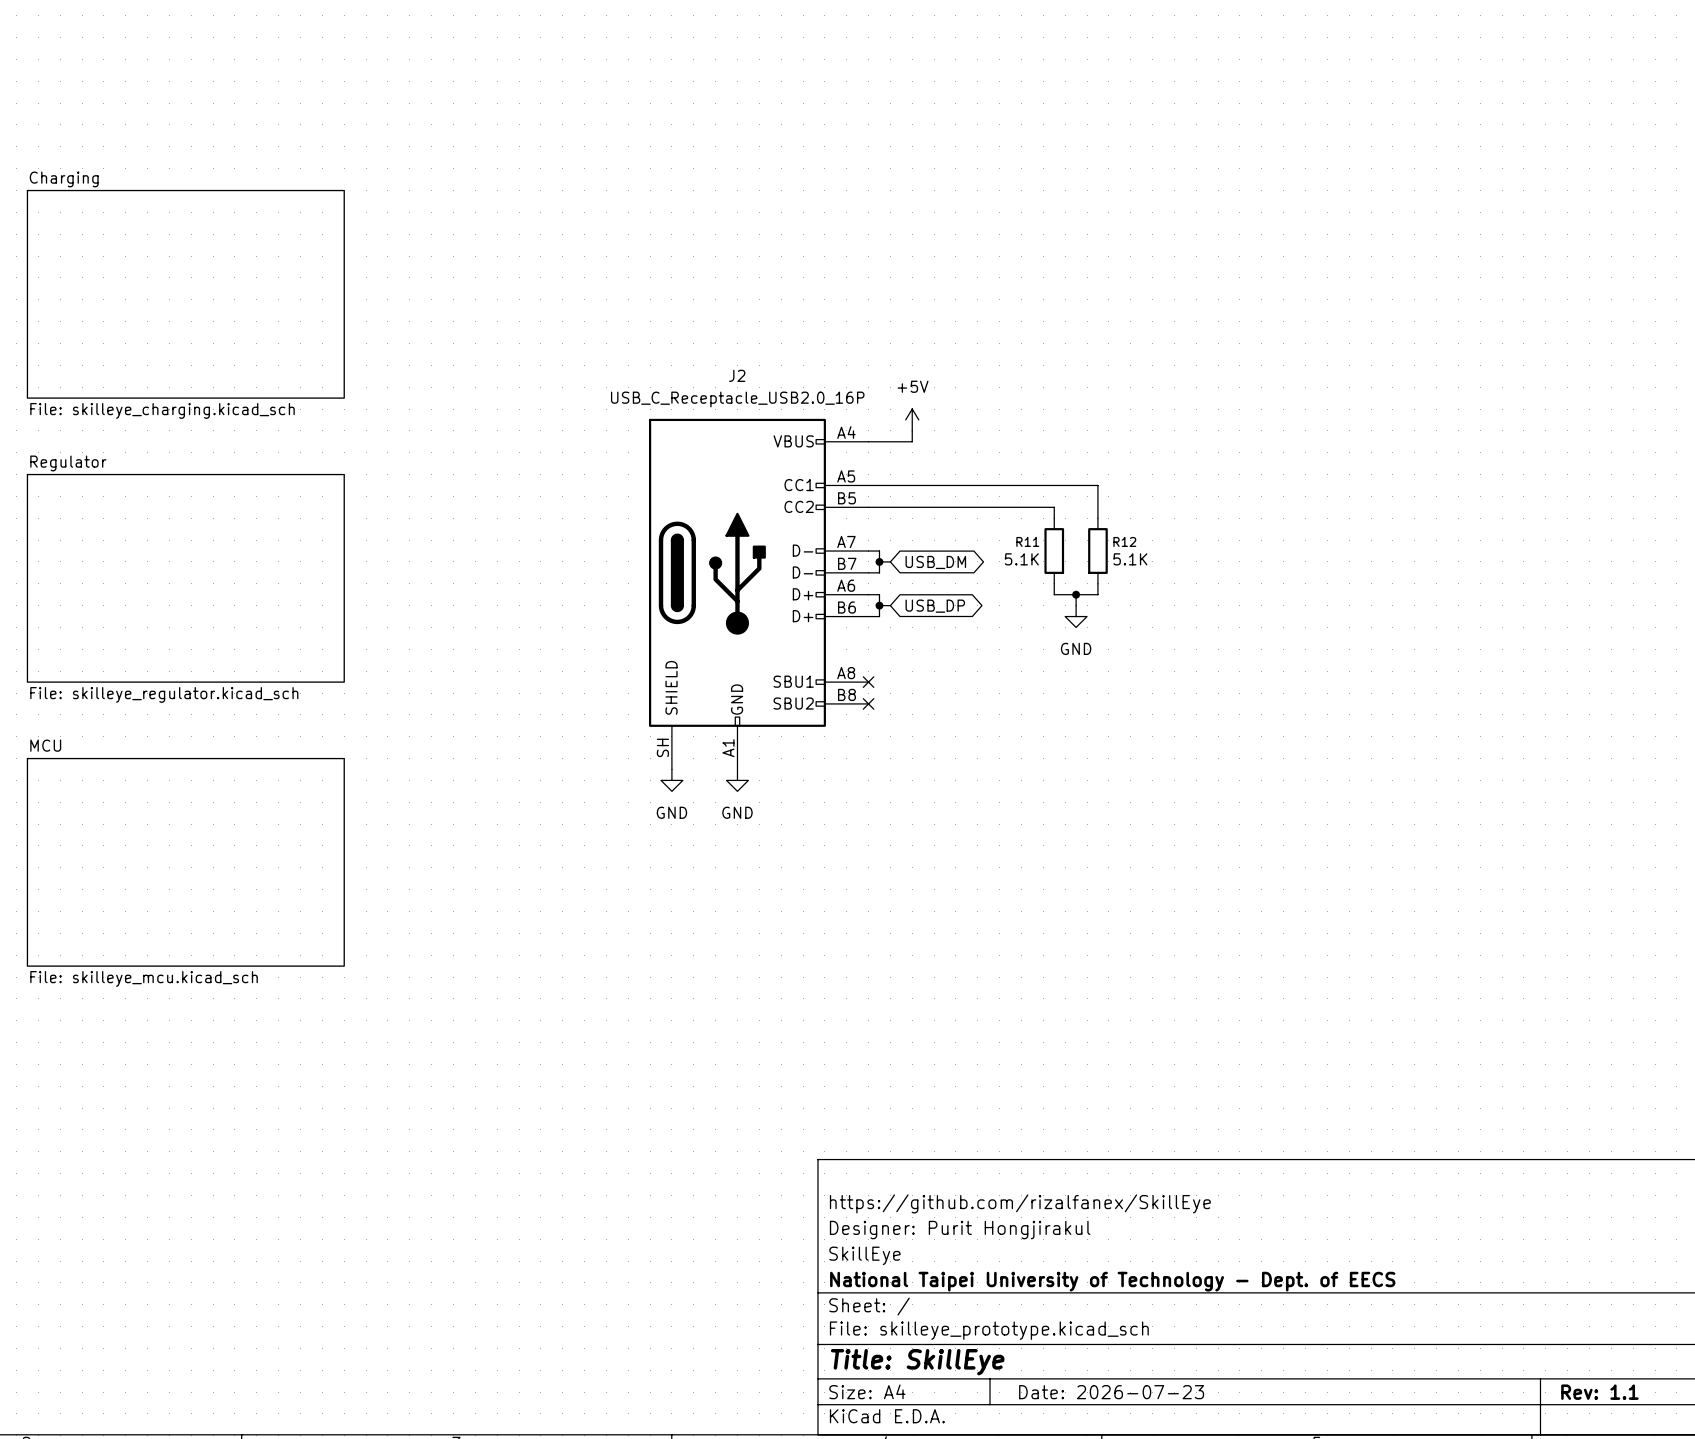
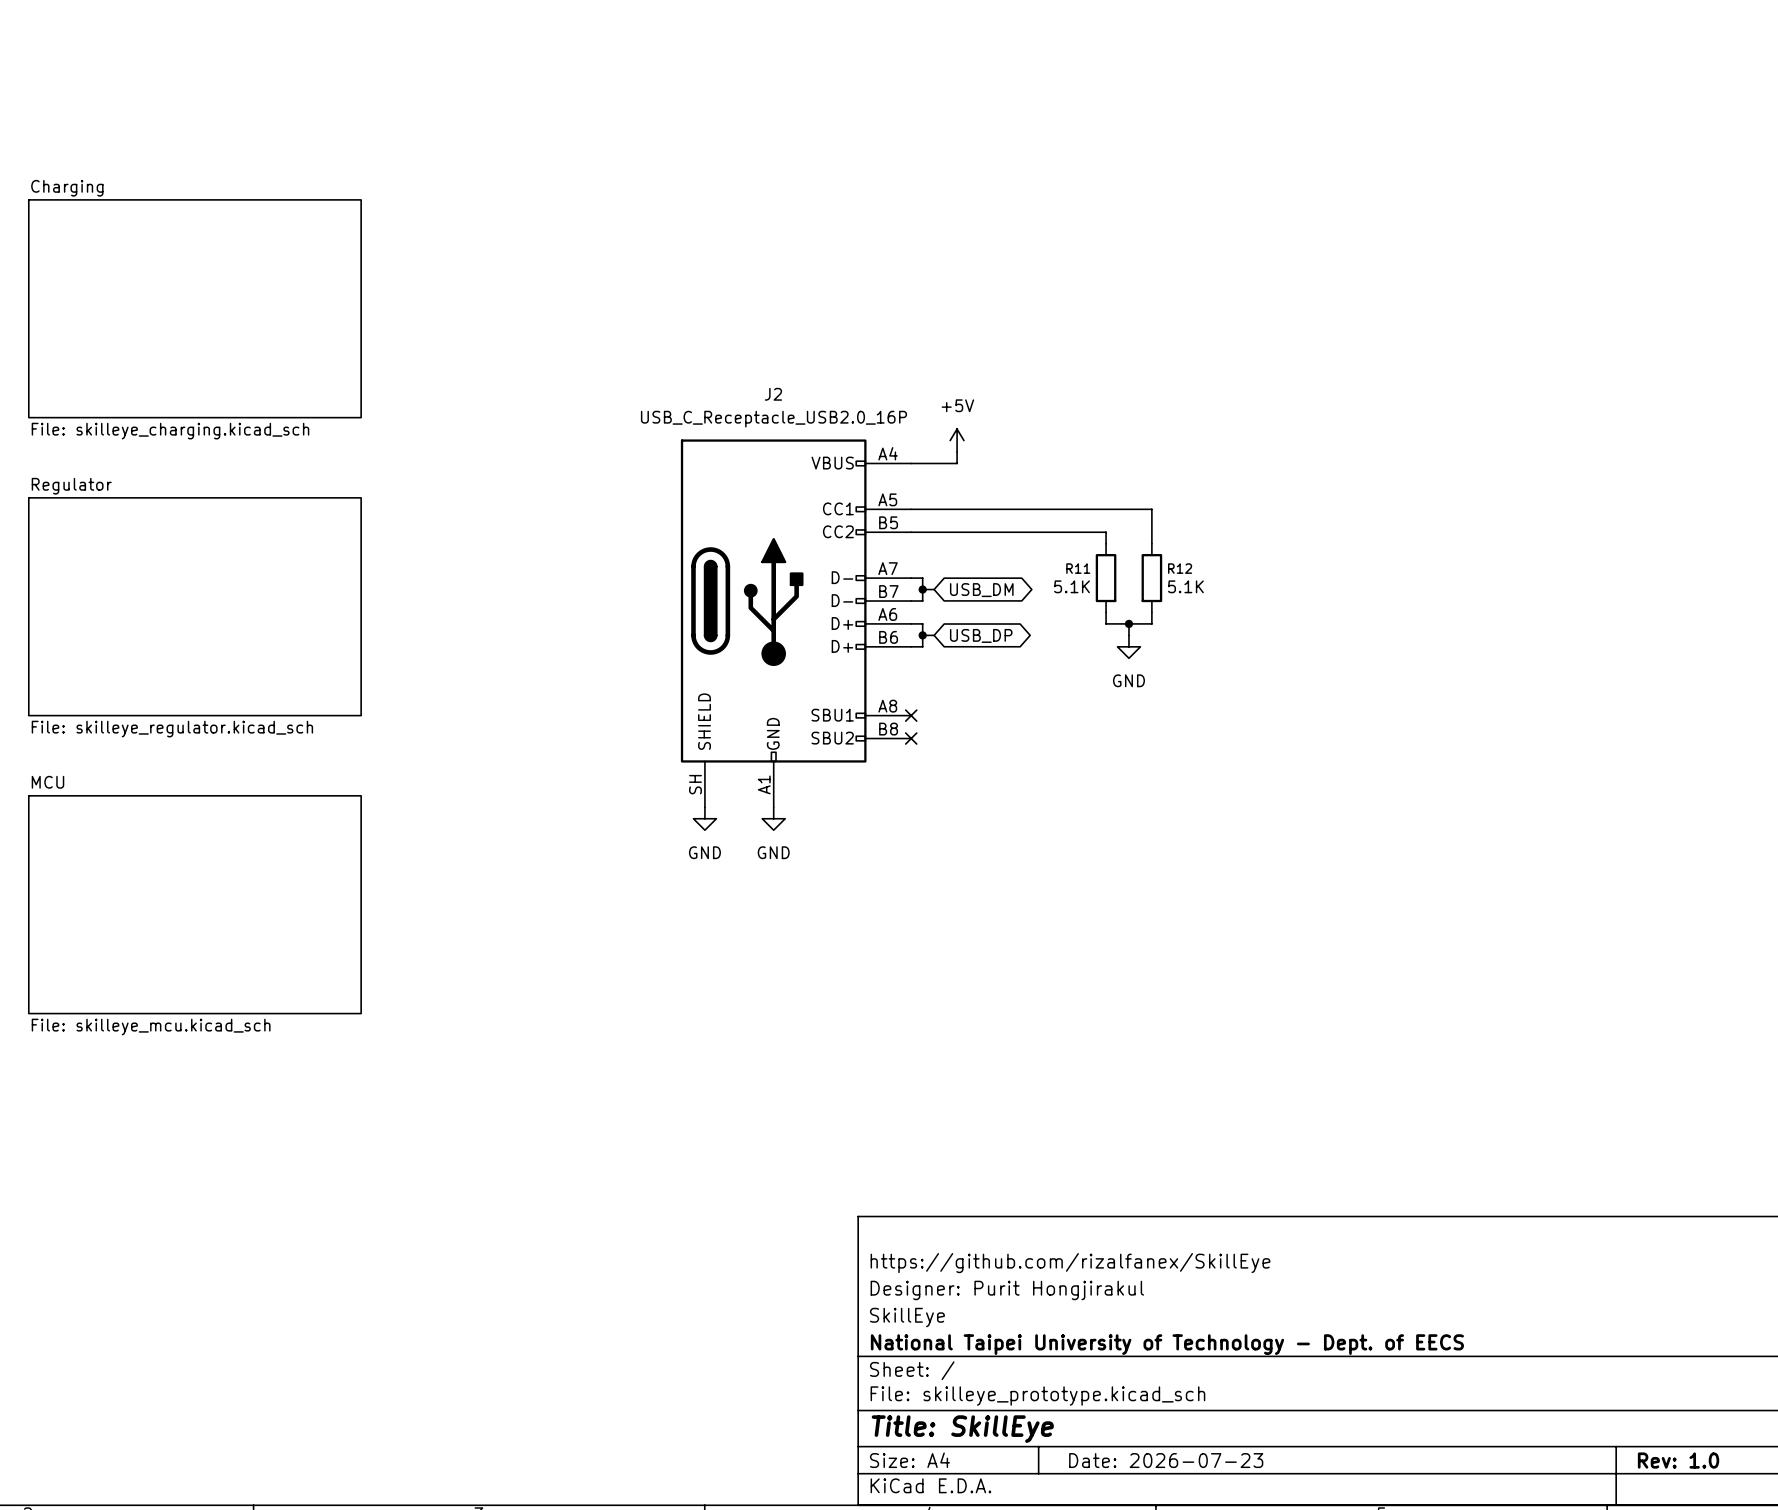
title block: Rev: 1.1 (1599, 1392) -> Rev: 1.0 (1678, 1460)

